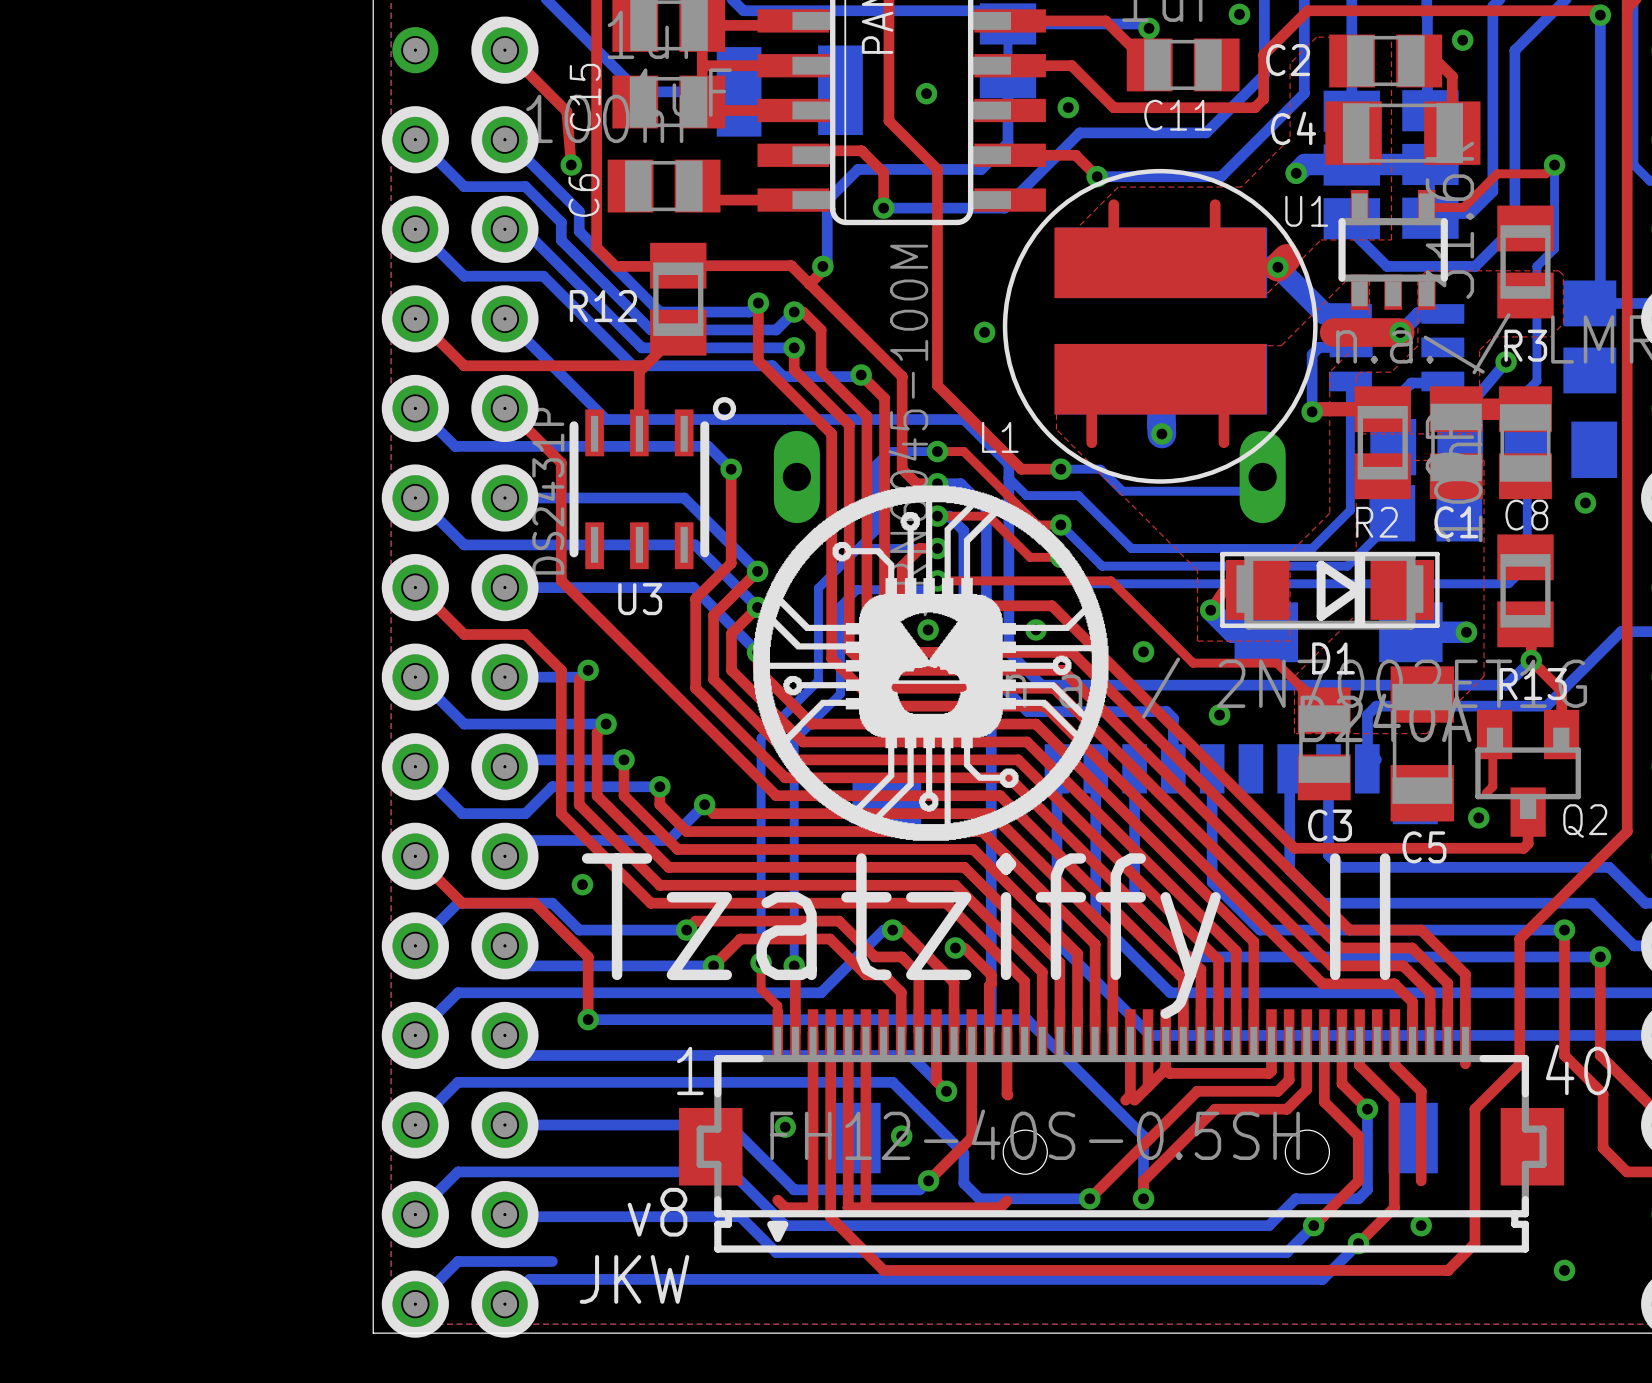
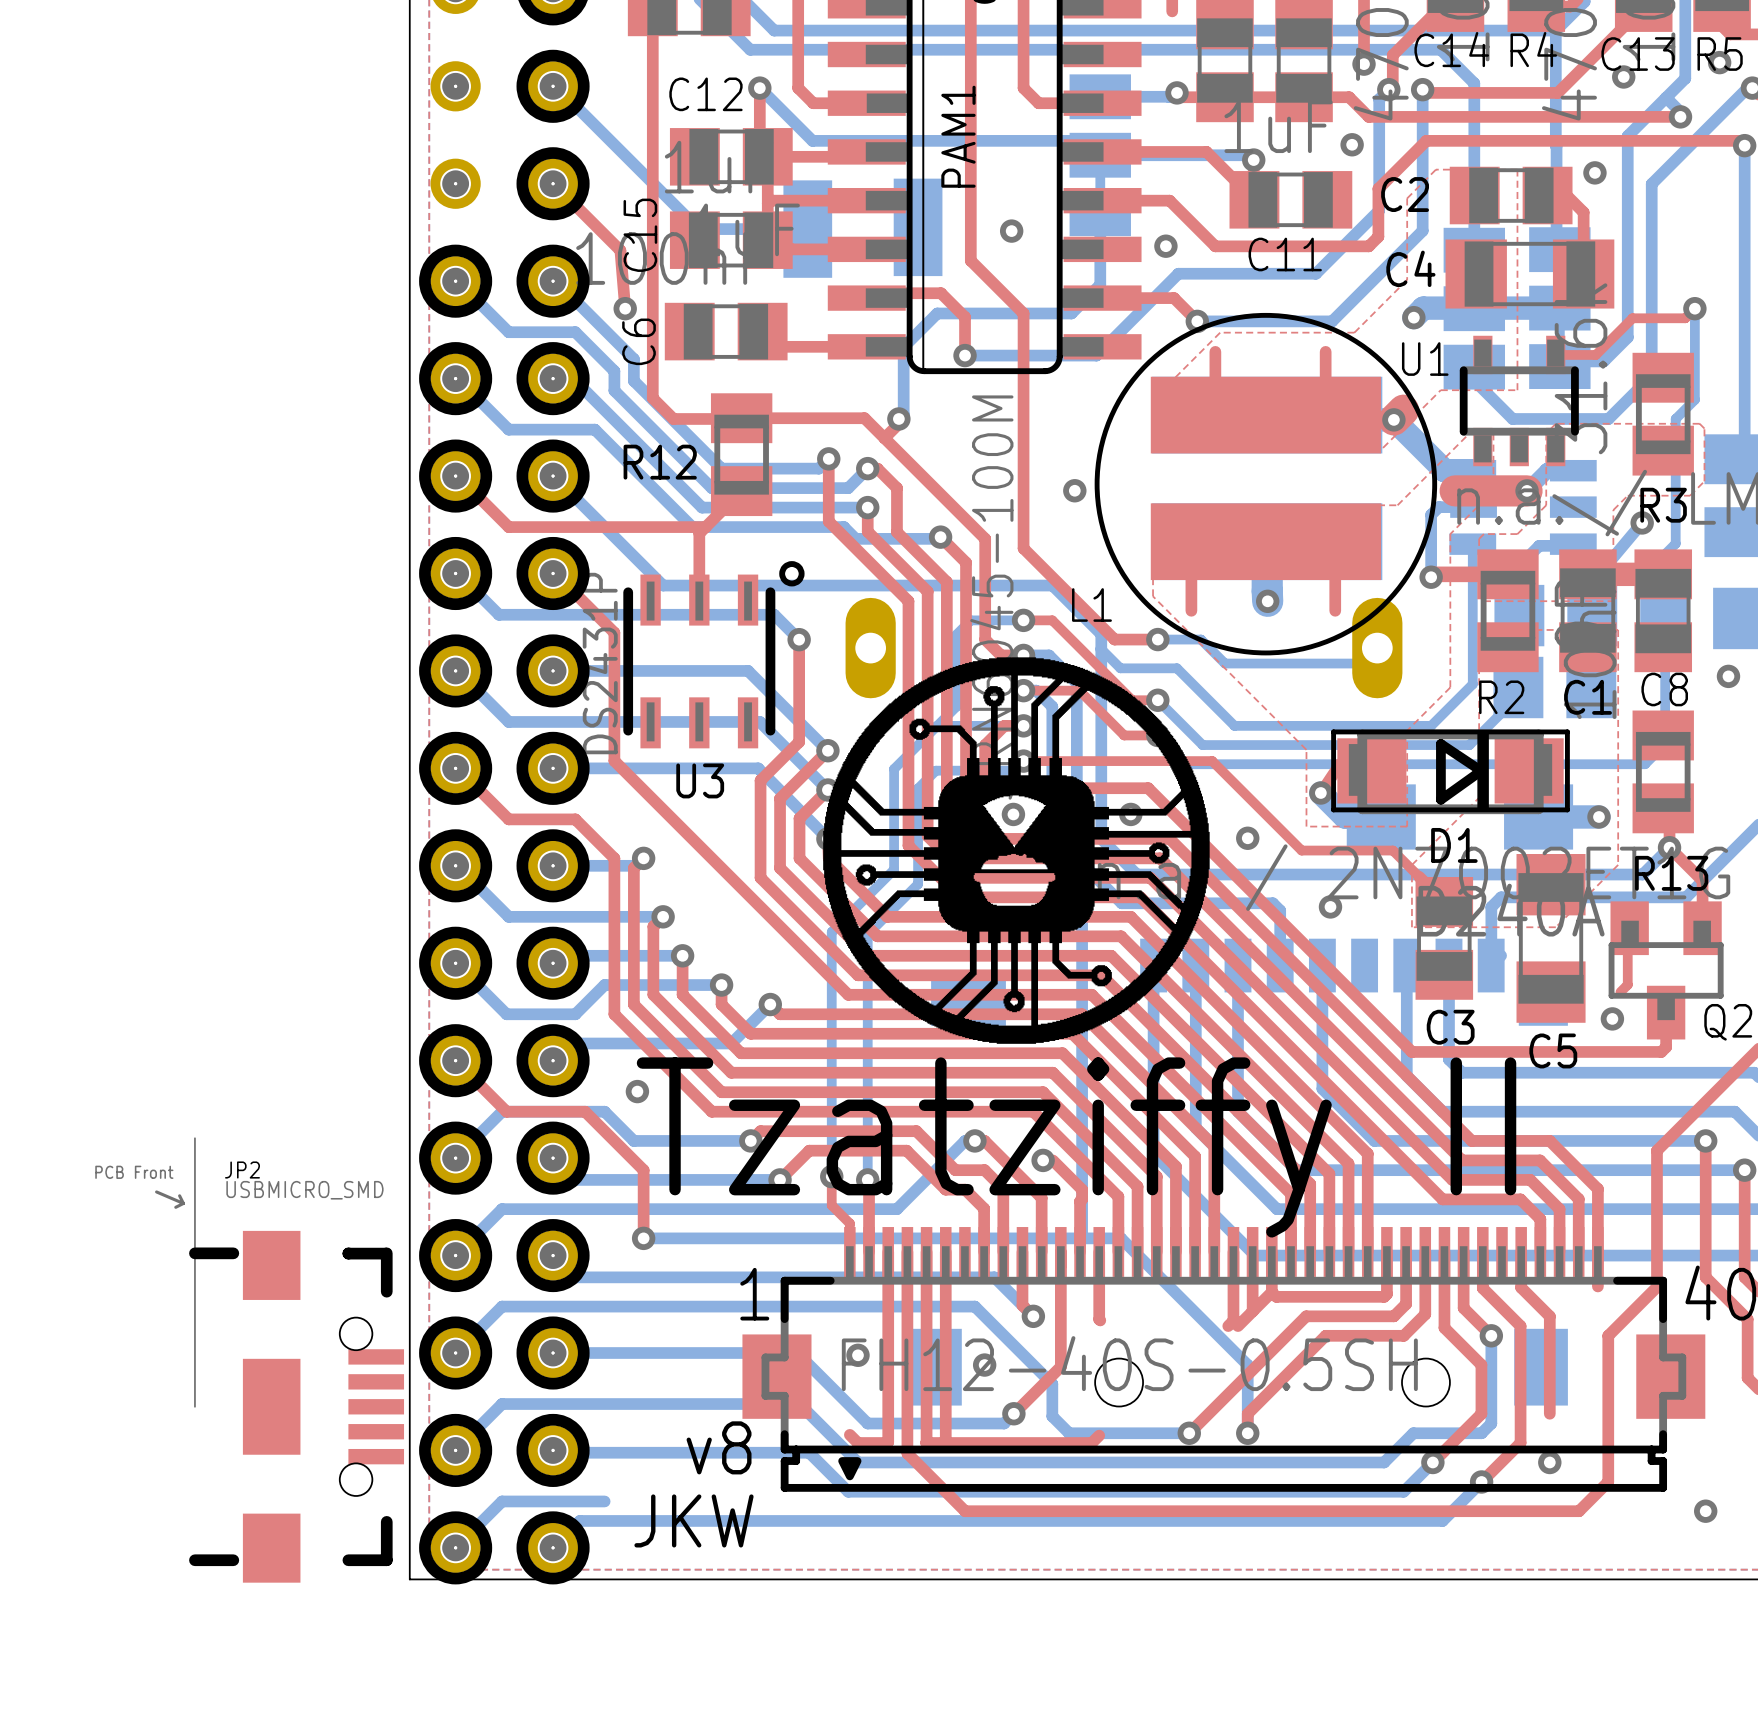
JP2: none -> USBMICRO_SMD (279, 1360)

